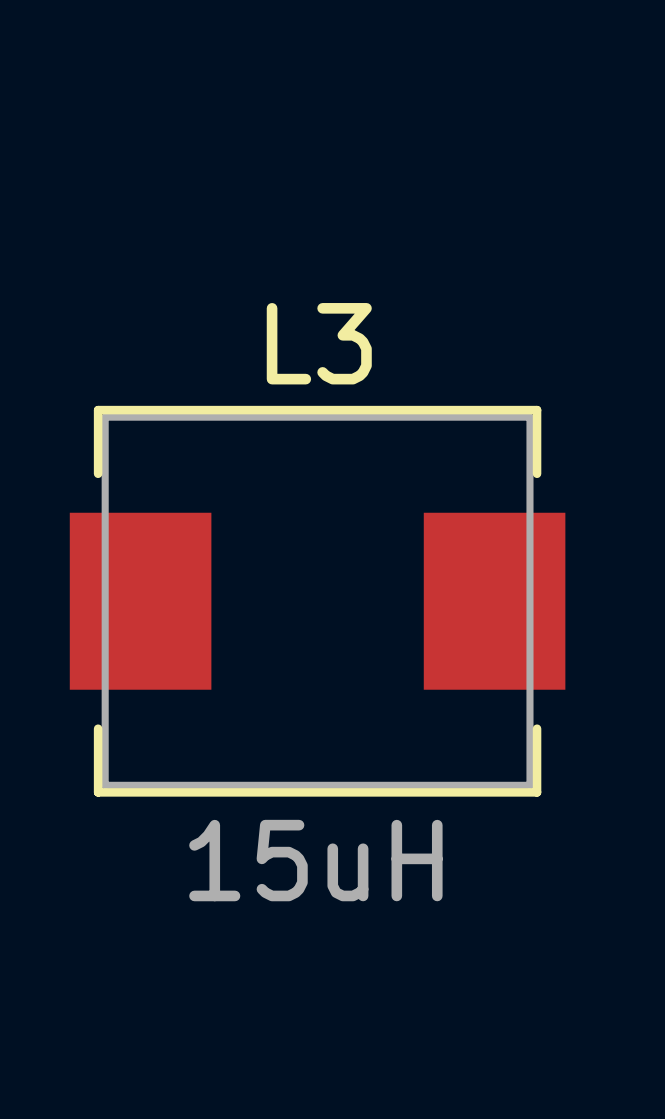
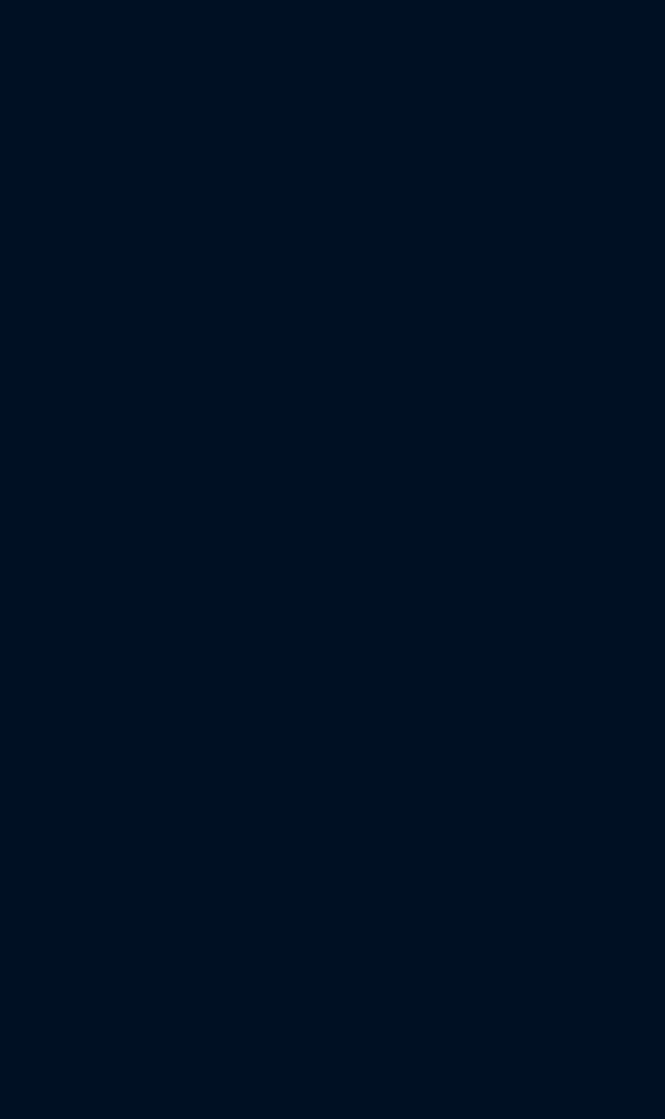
L3: 15uH (317, 601) -> none

